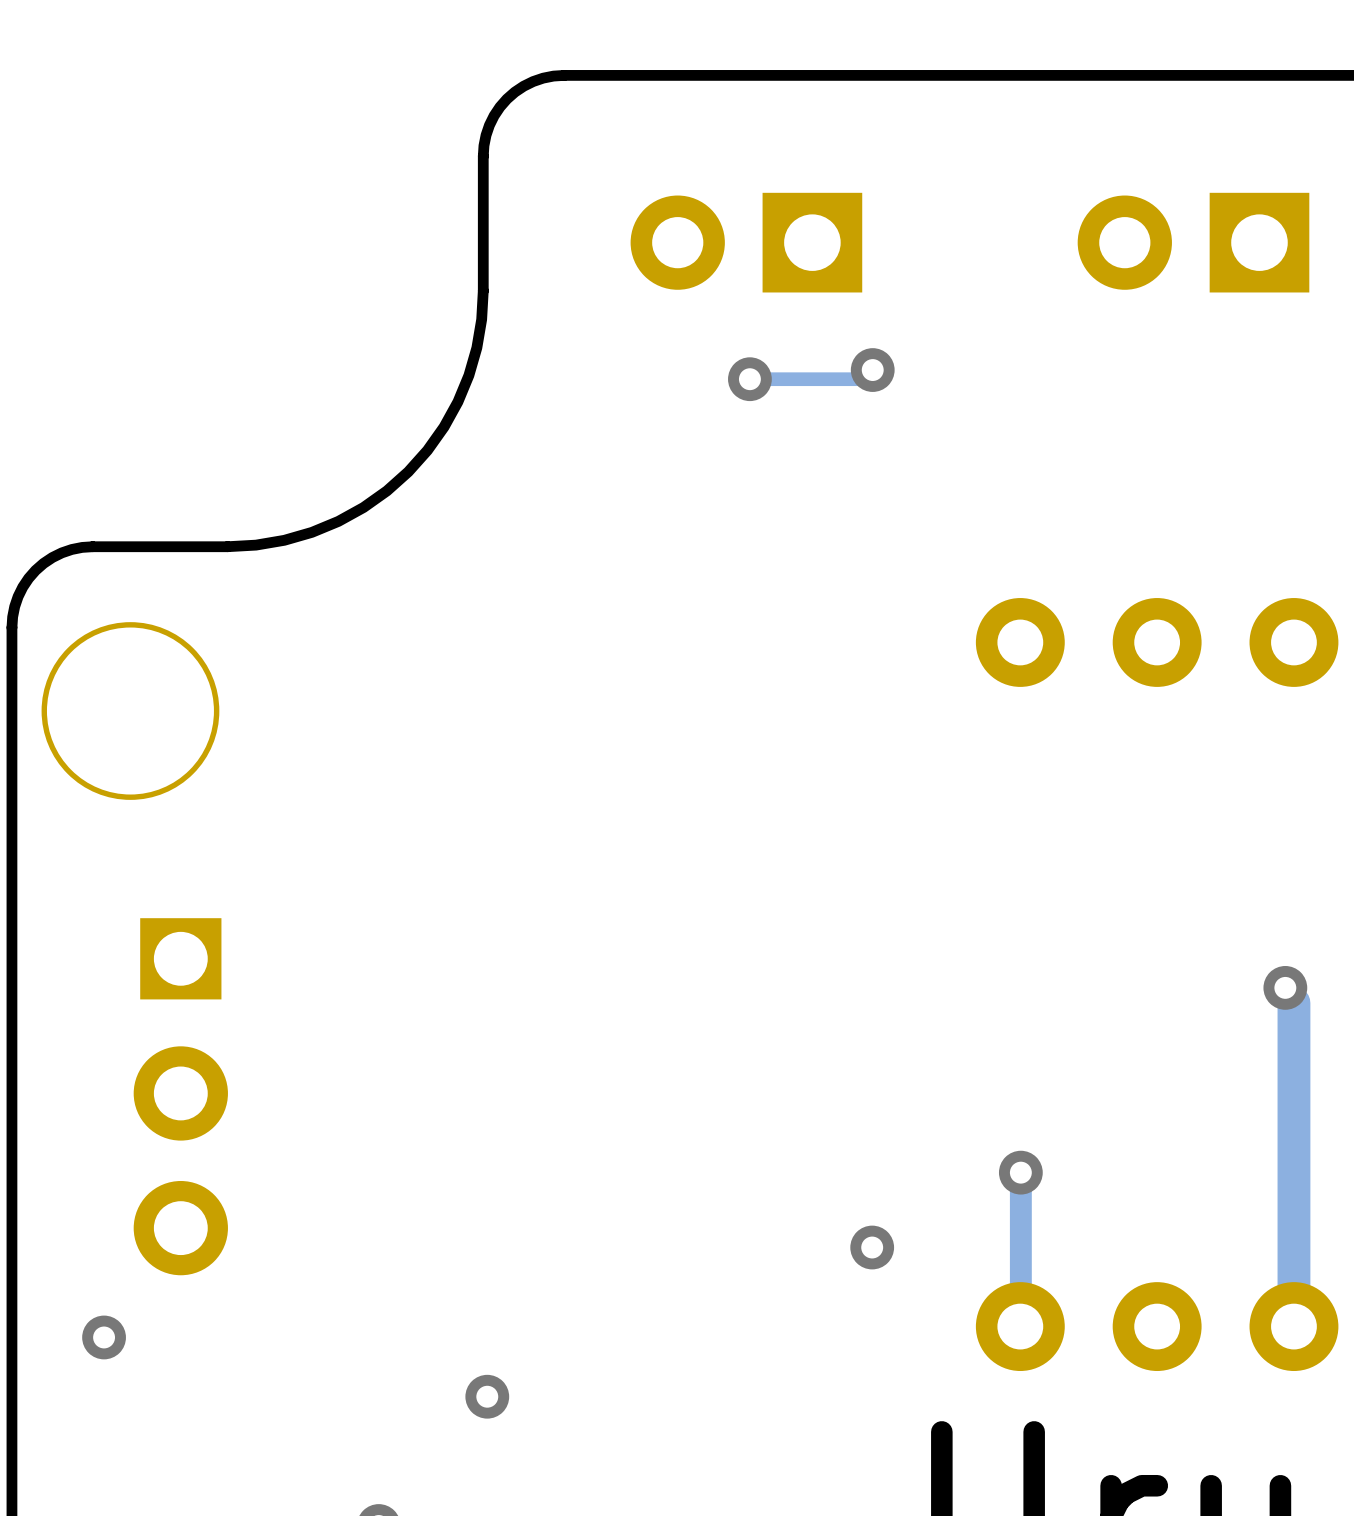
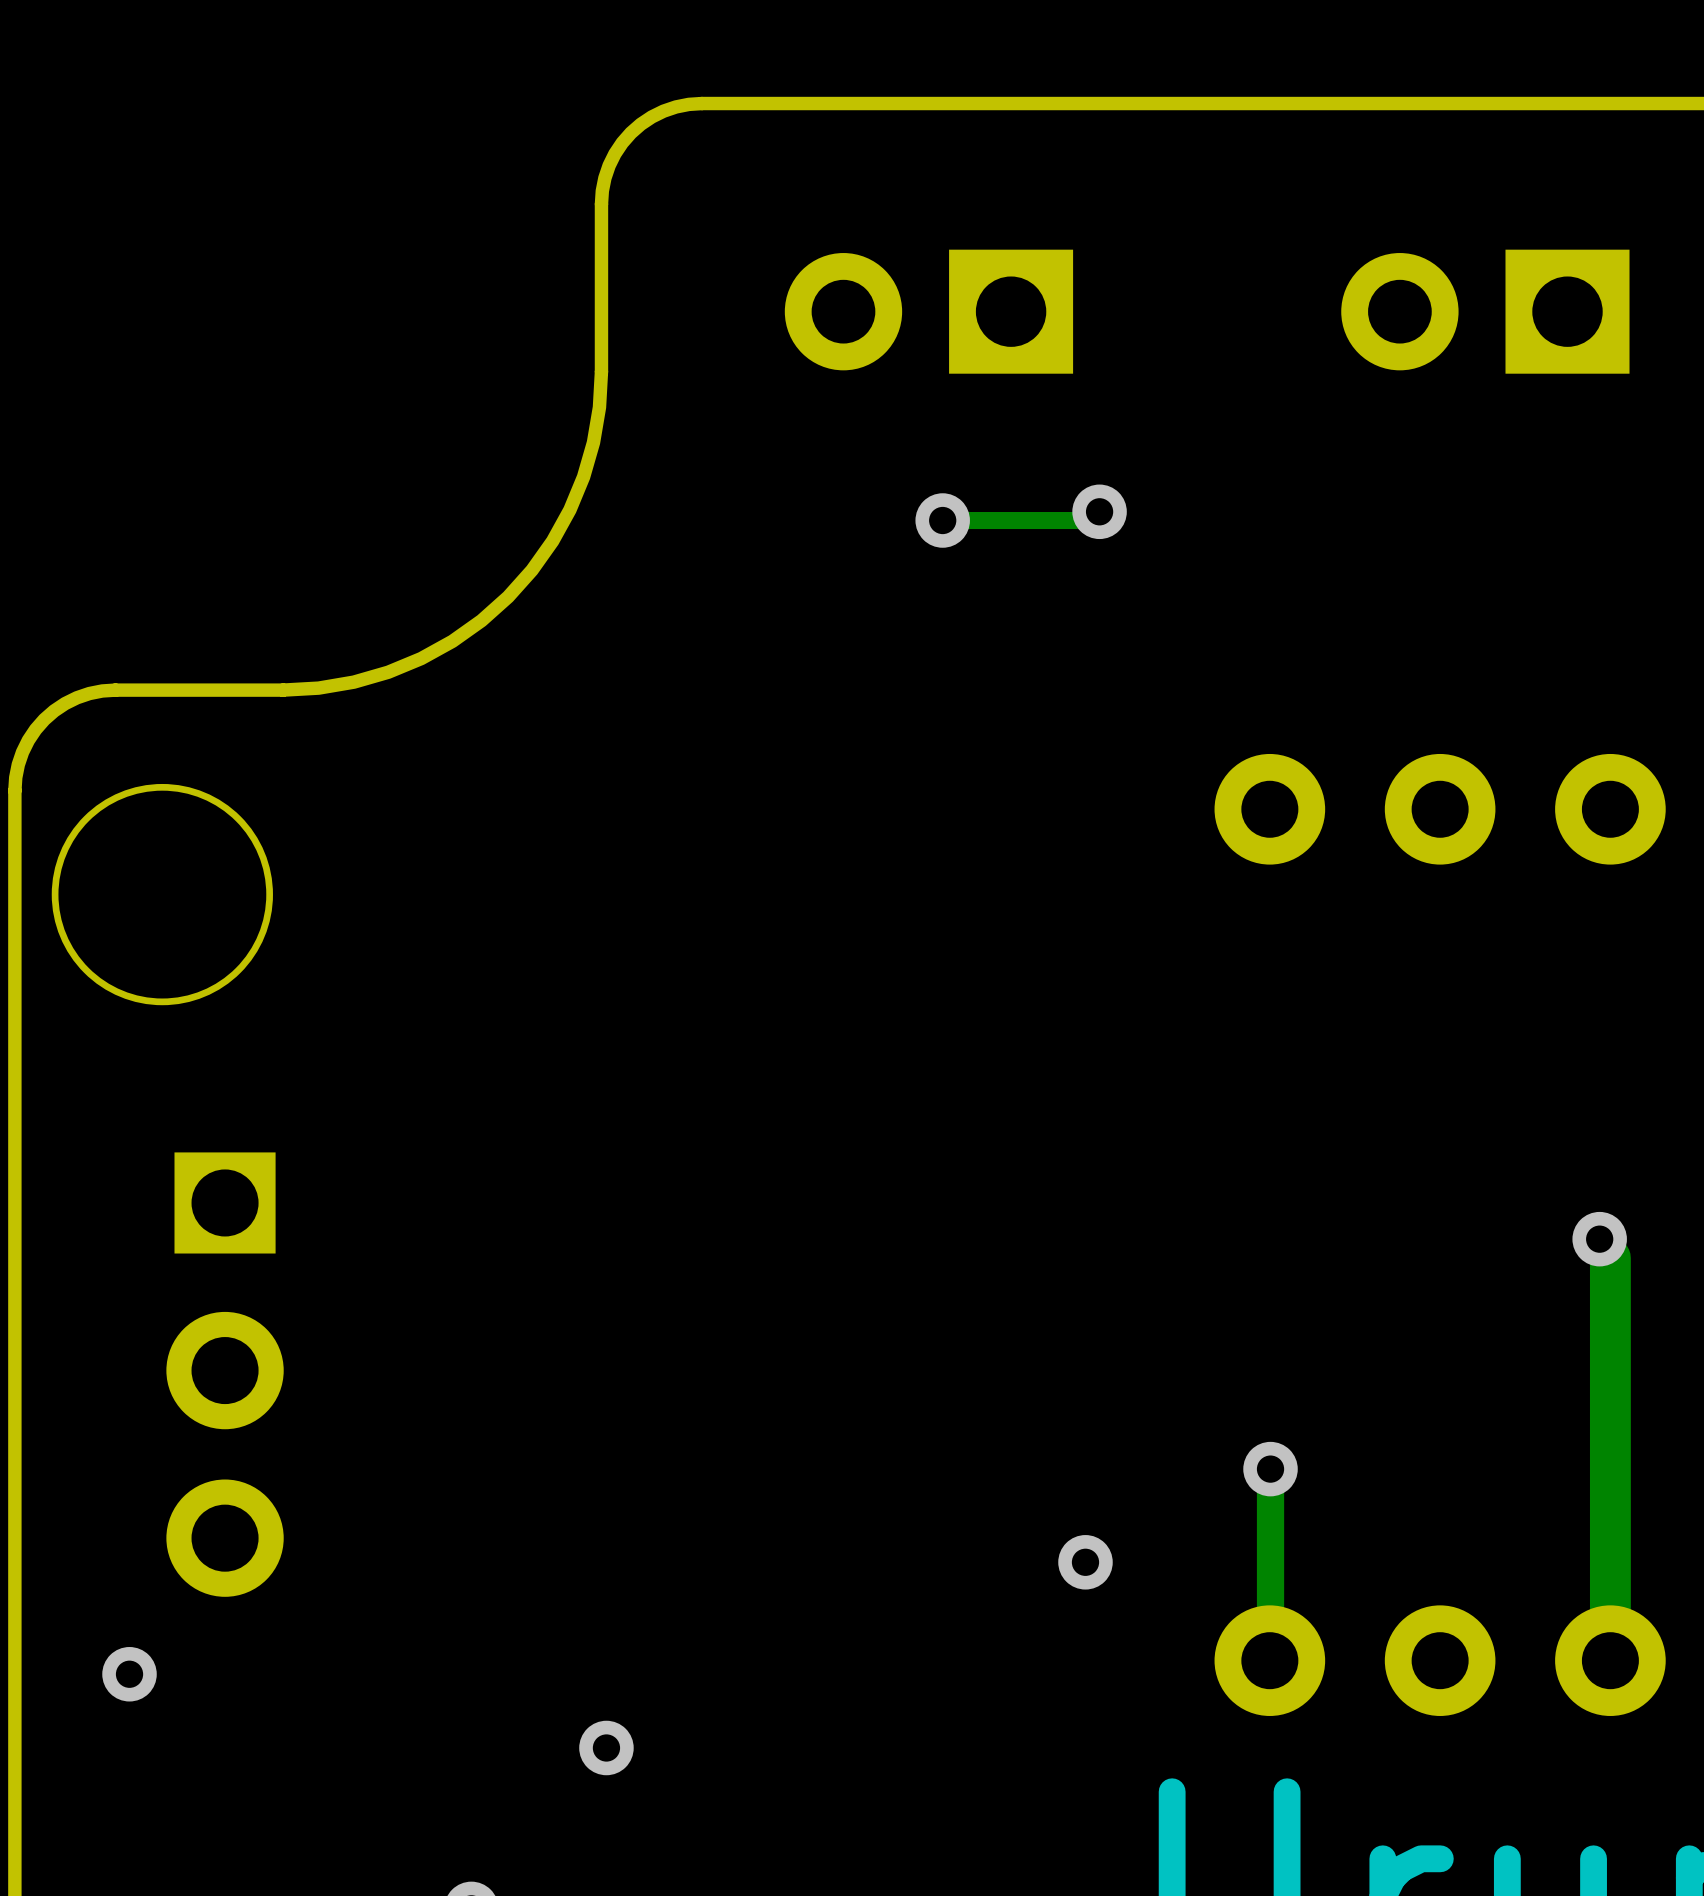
track: (872, 370) (863, 379) (749, 379) -> none
via position: (872, 370) -> (1099, 511)
via position: (749, 379) -> (942, 520)
track: none -> (1099, 511) (1090, 520) (942, 520)

